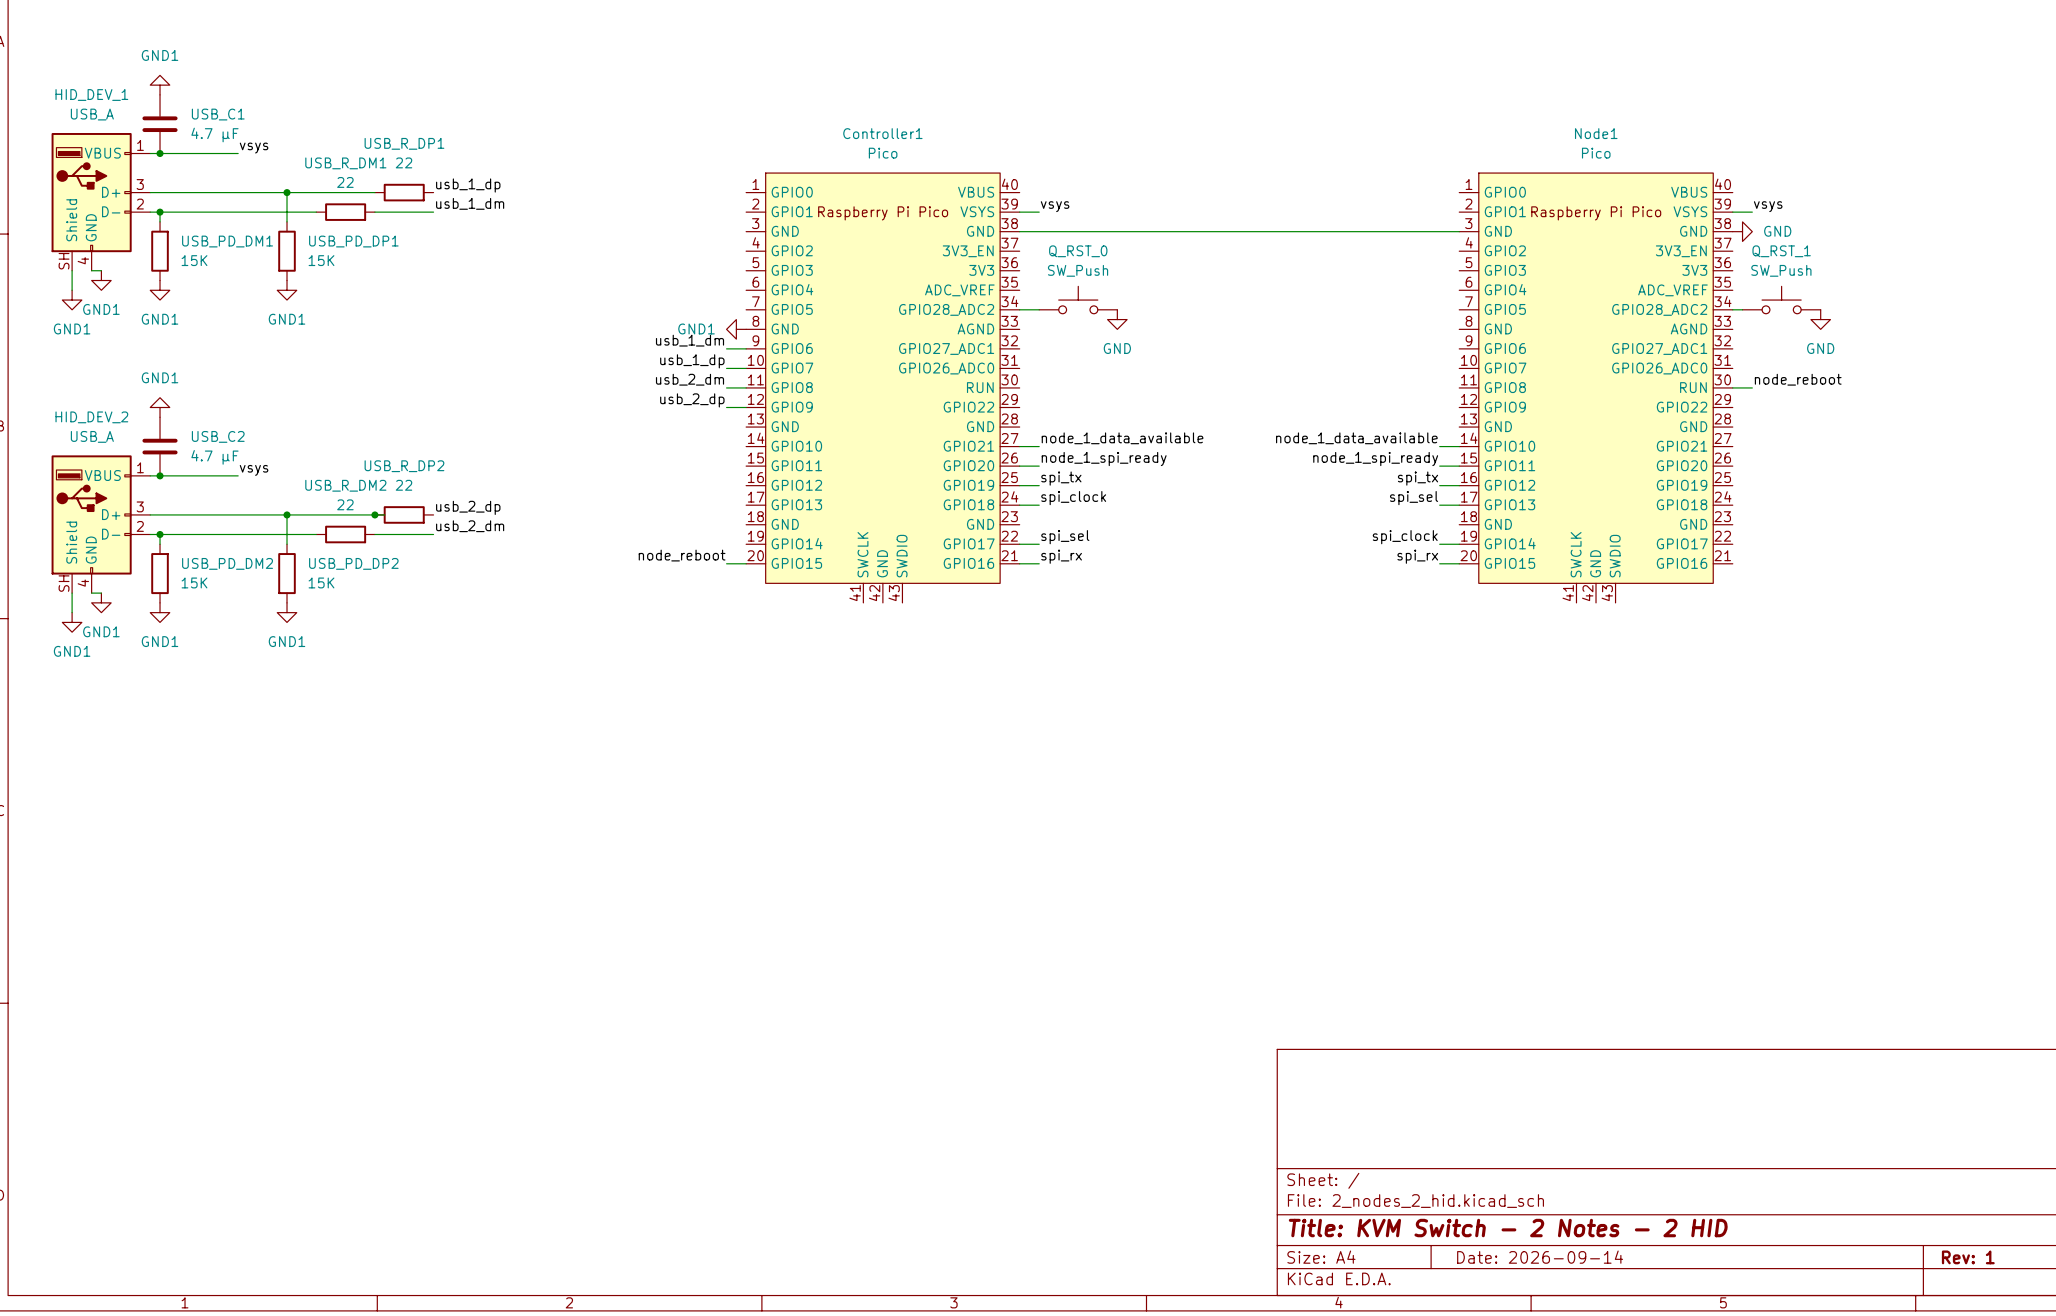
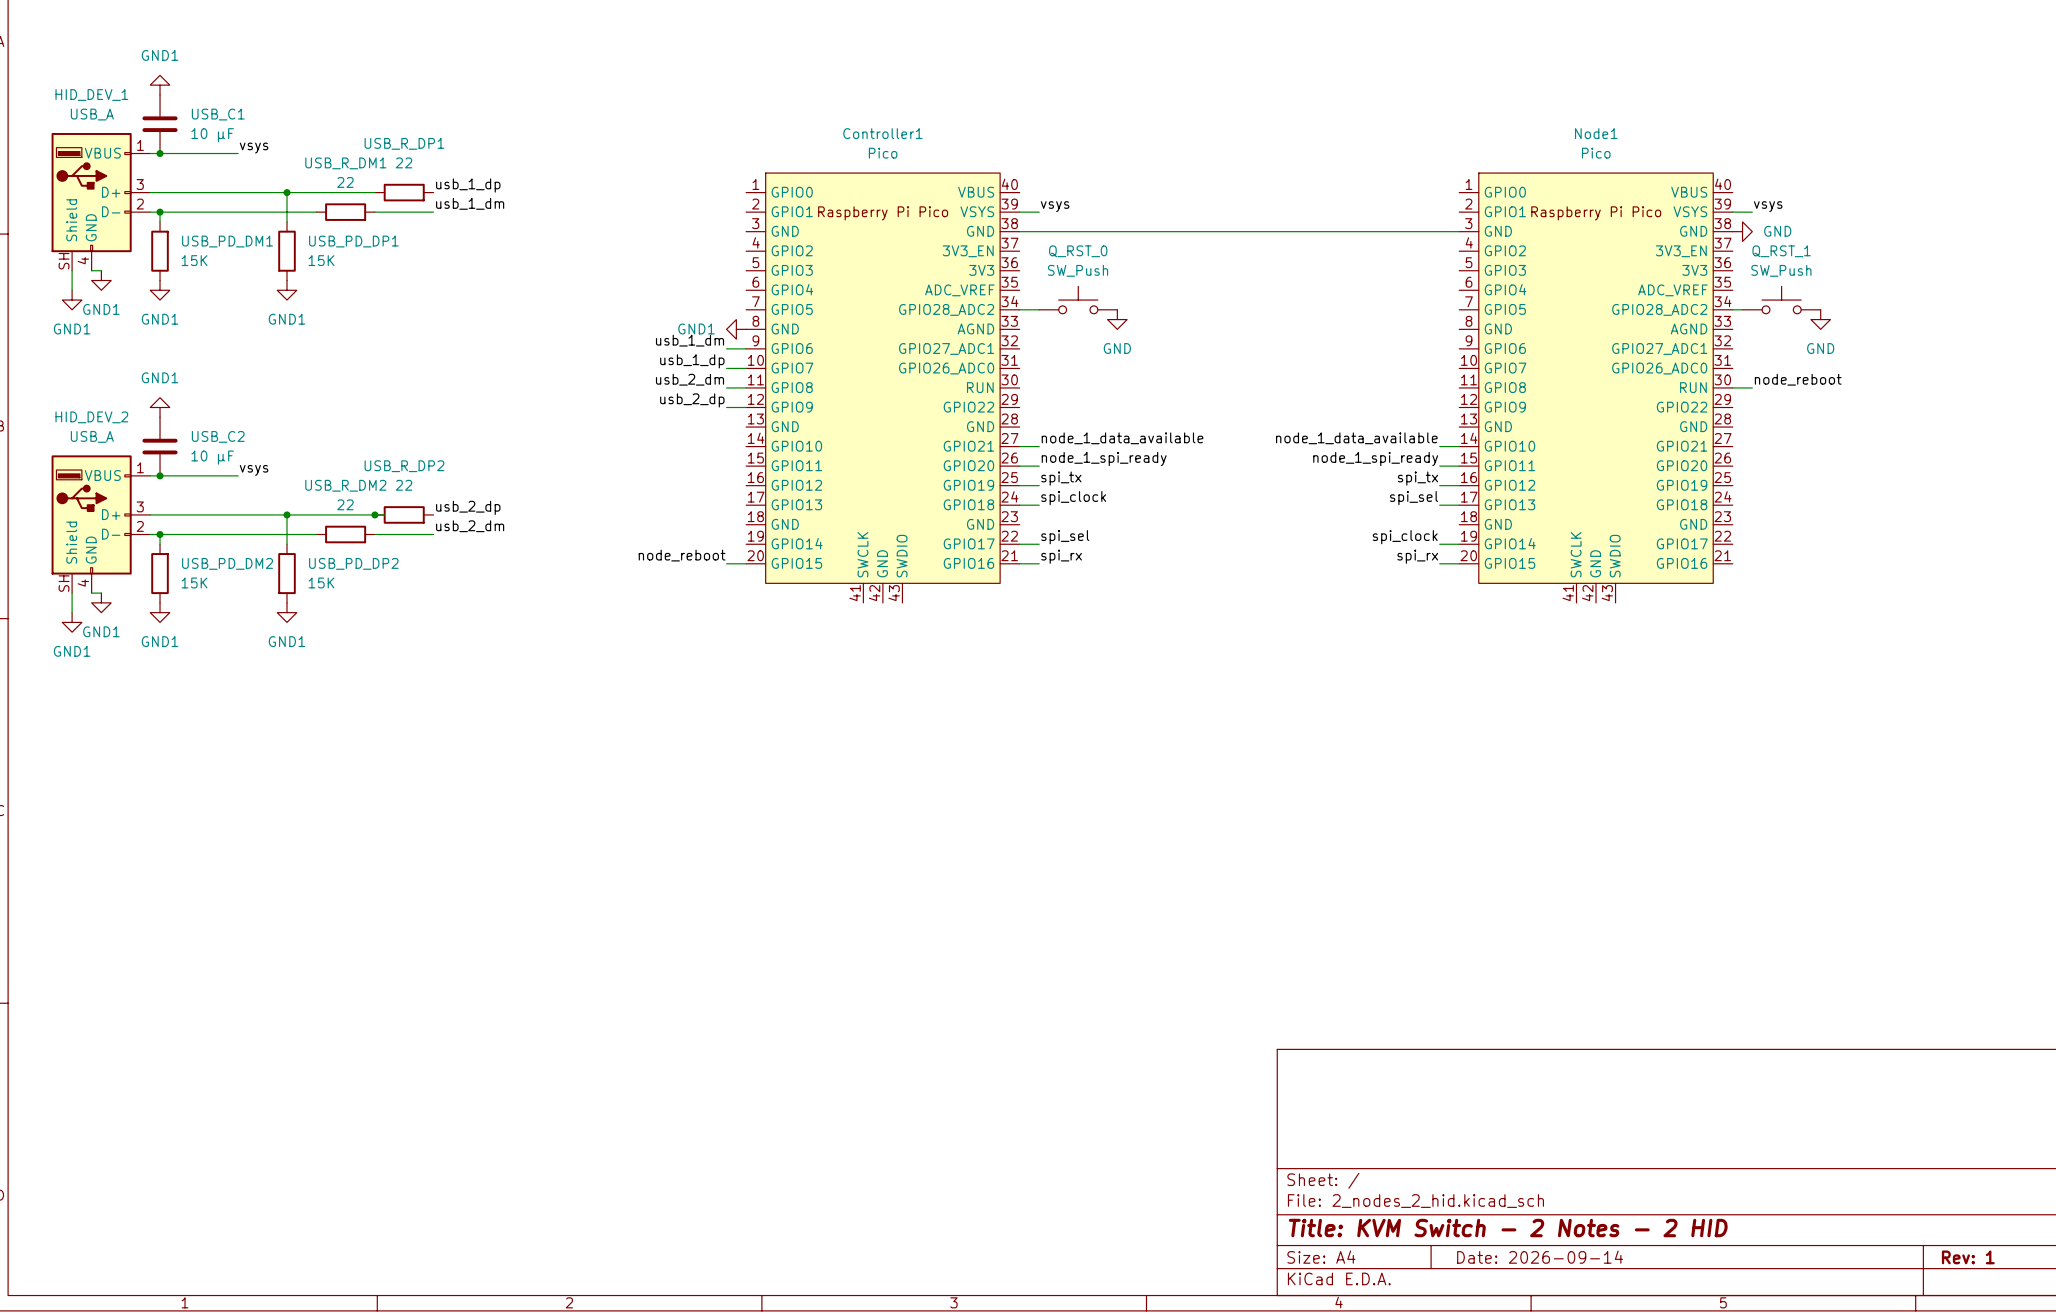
USB_C1 value: 4.7 µF (214, 135) -> 10 µF (212, 135)
USB_C2 value: 4.7 µF (214, 457) -> 10 µF (212, 457)

